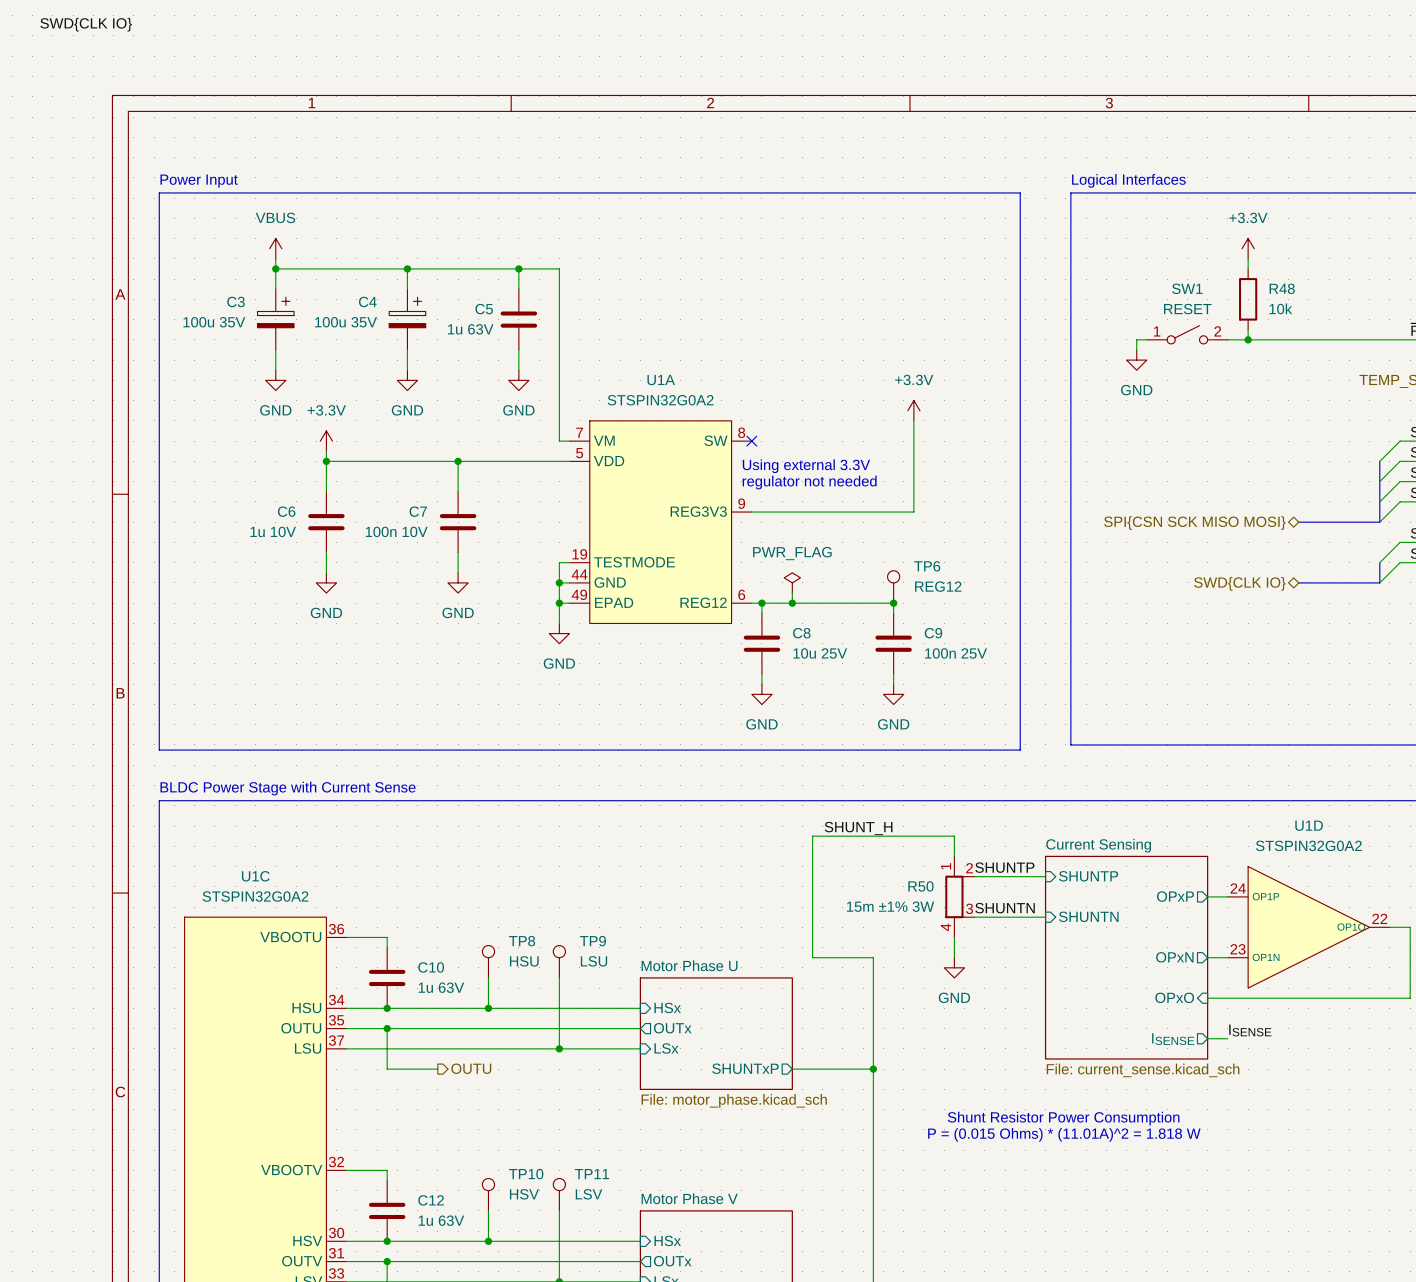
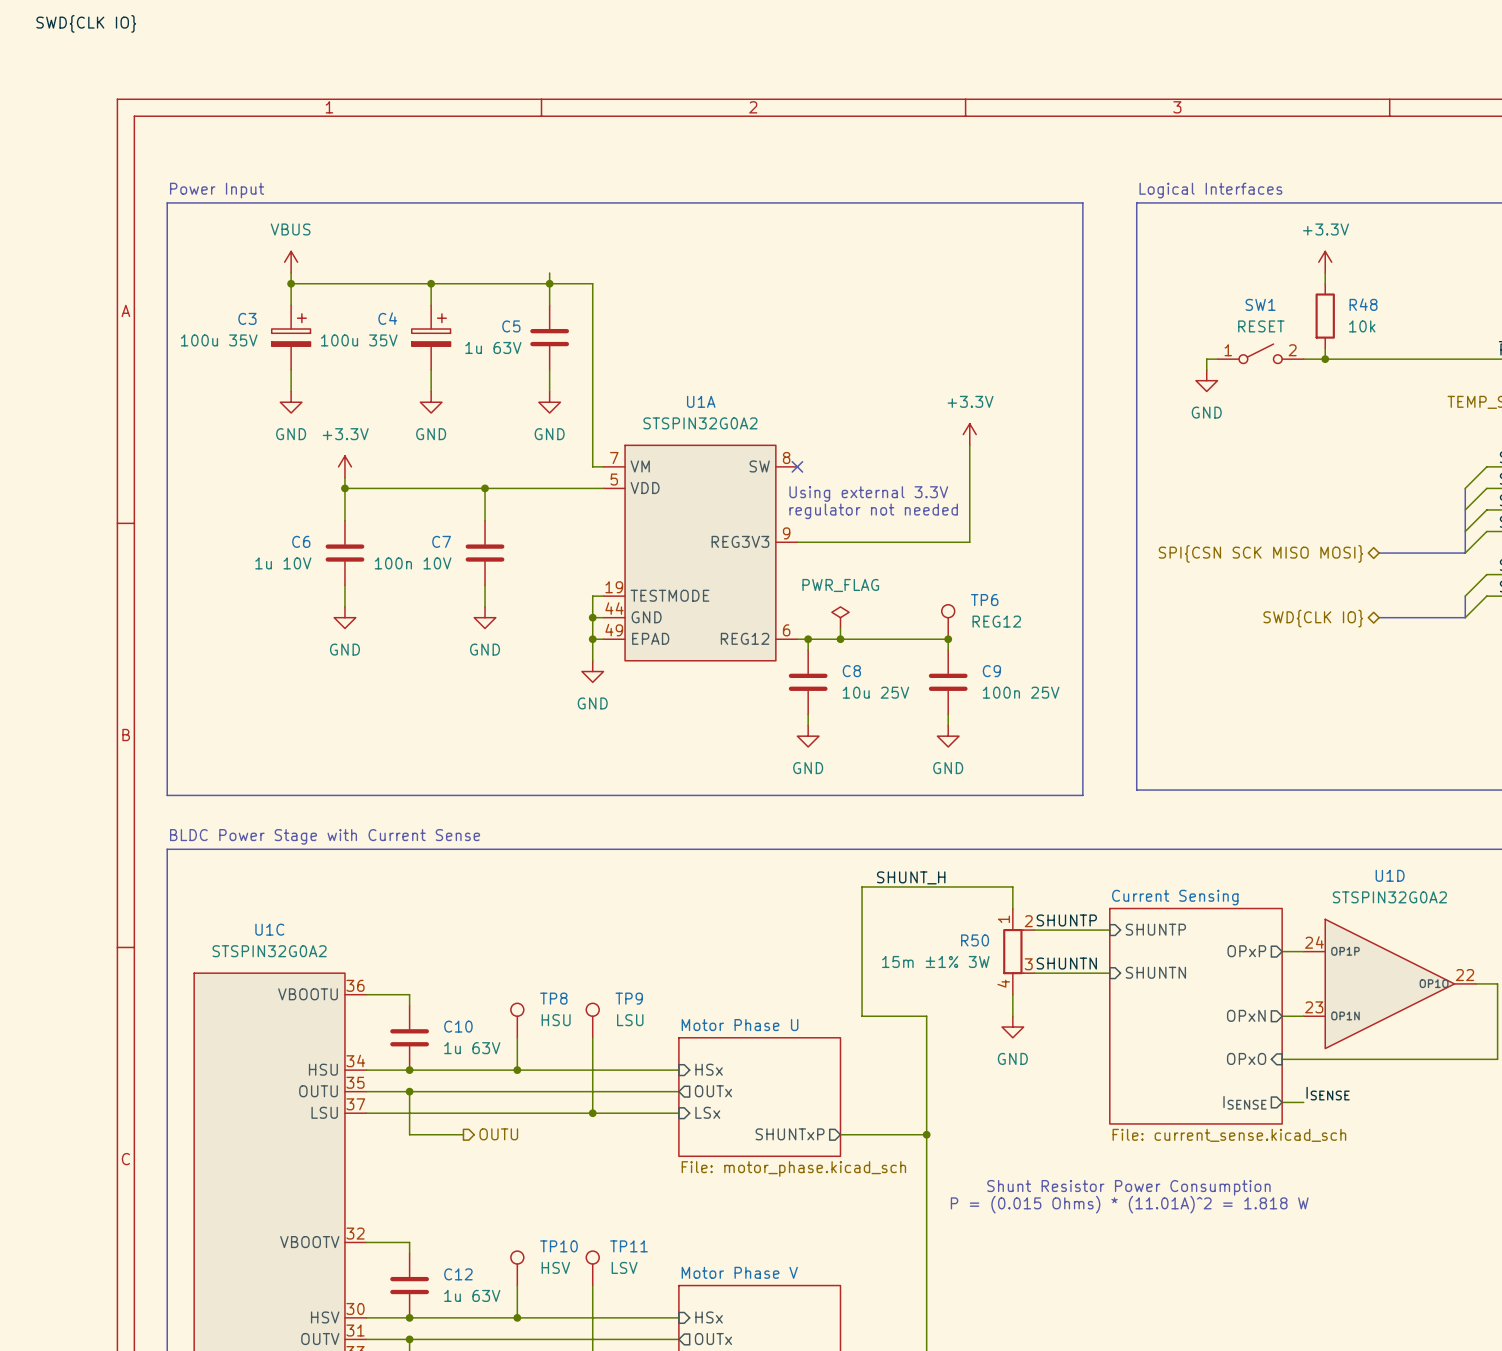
wire: none -> (549, 272) (549, 283)

